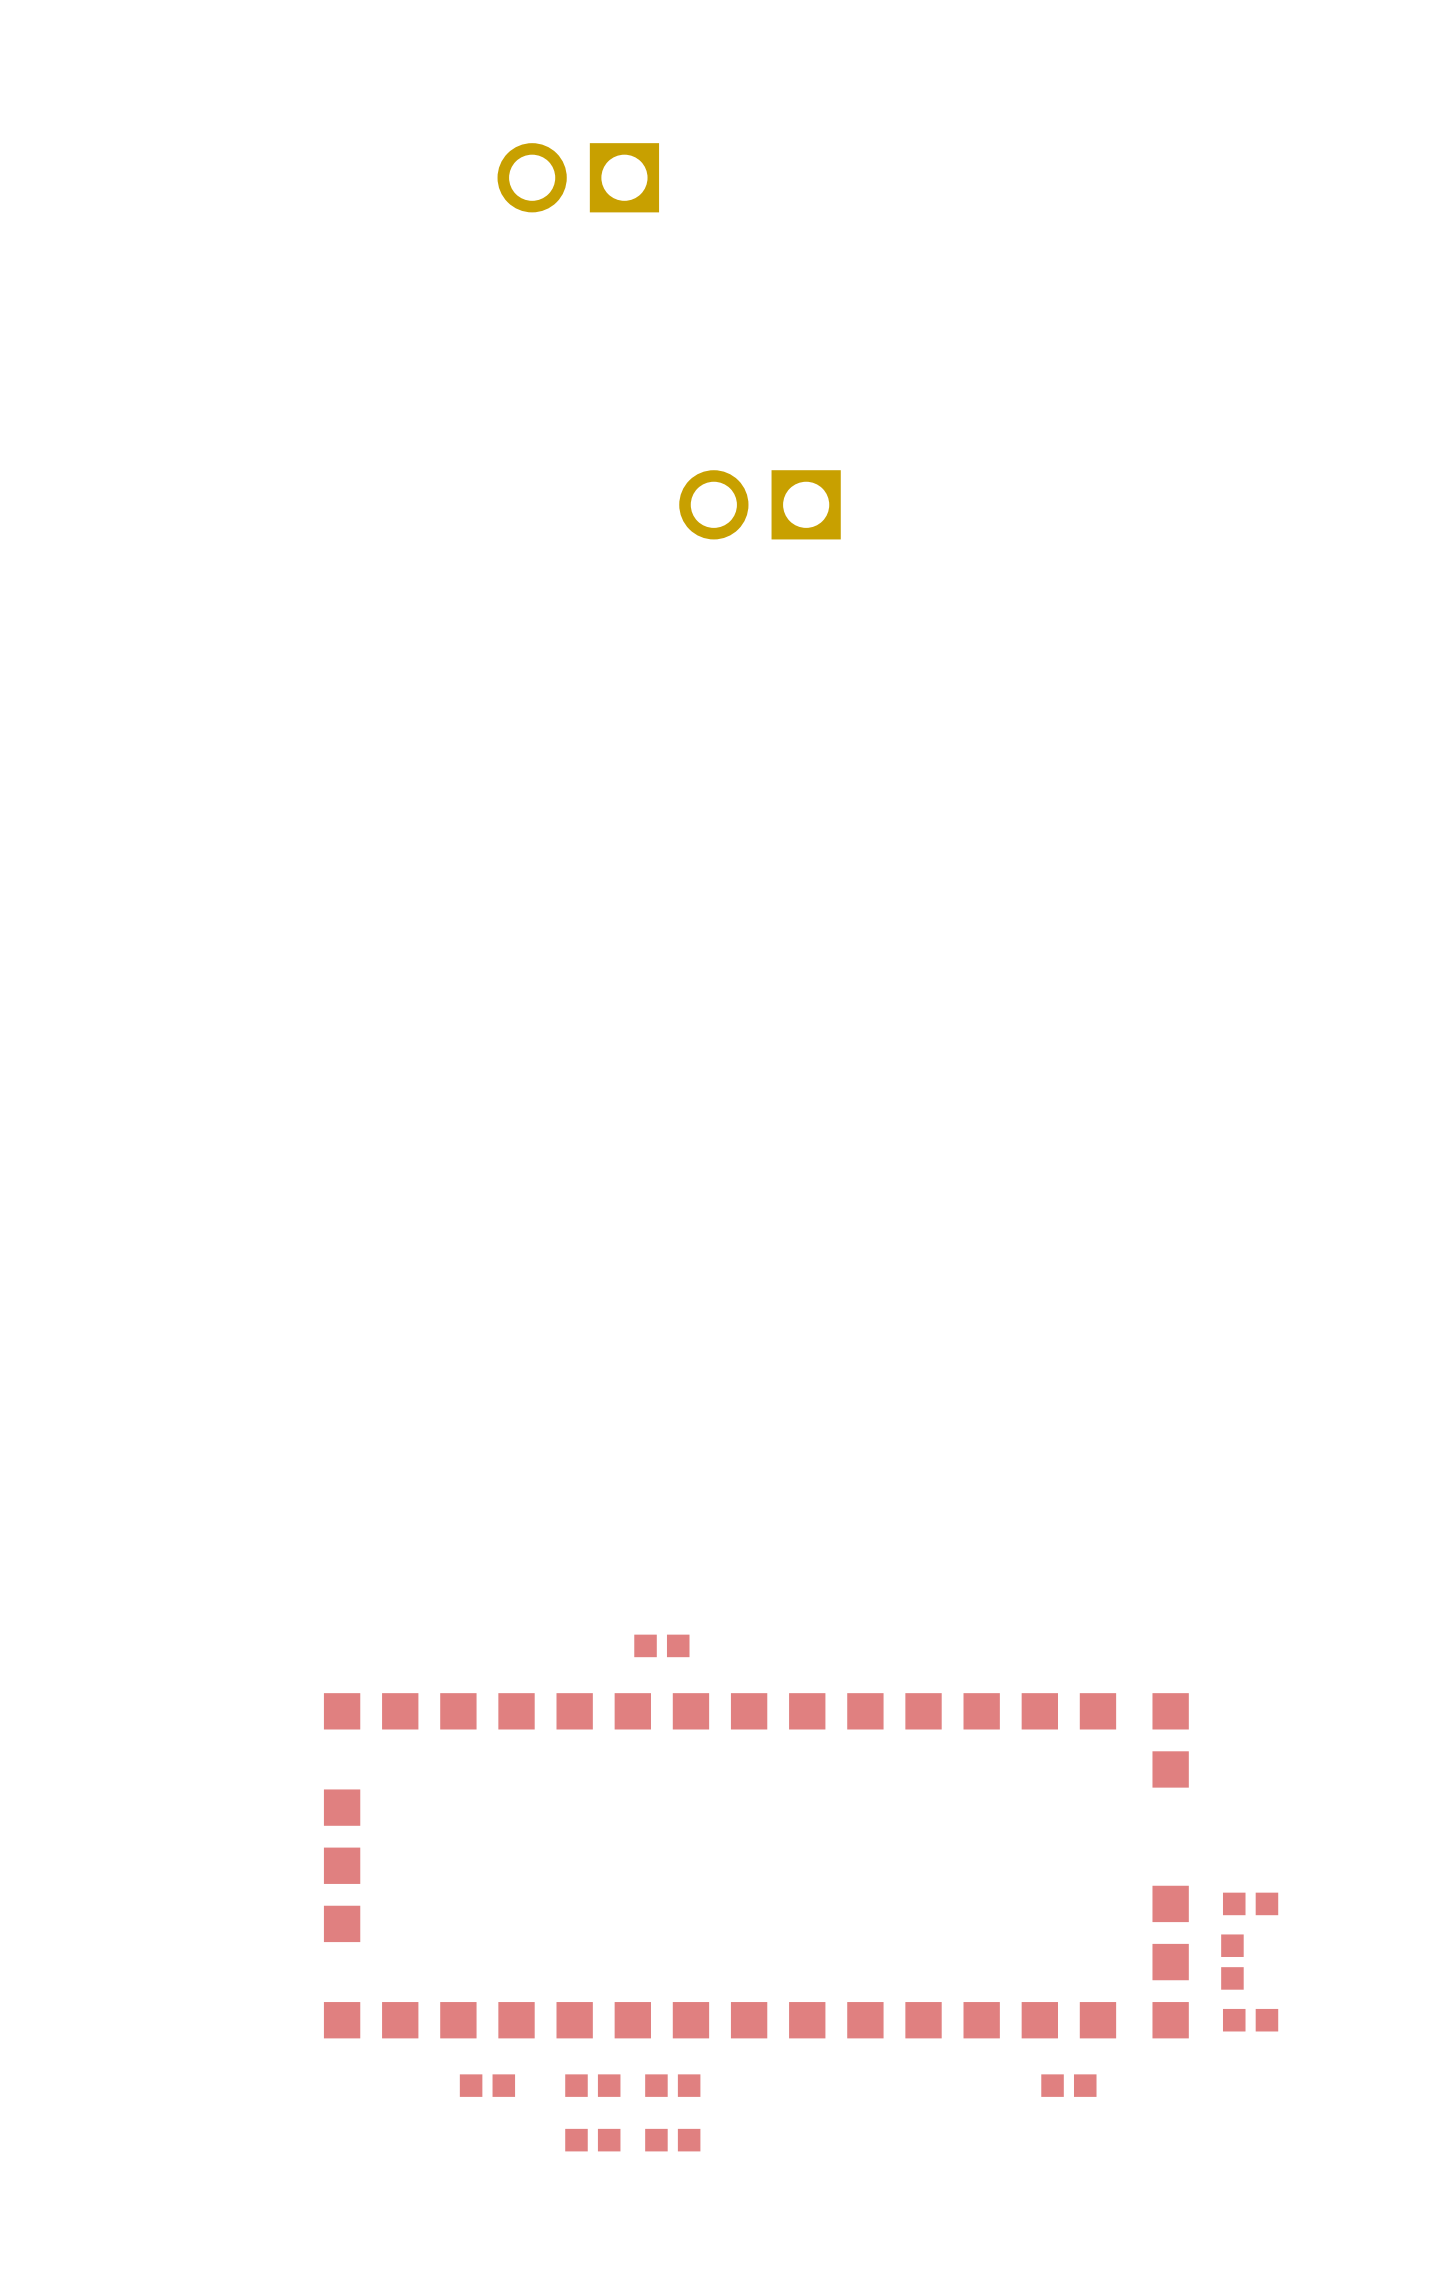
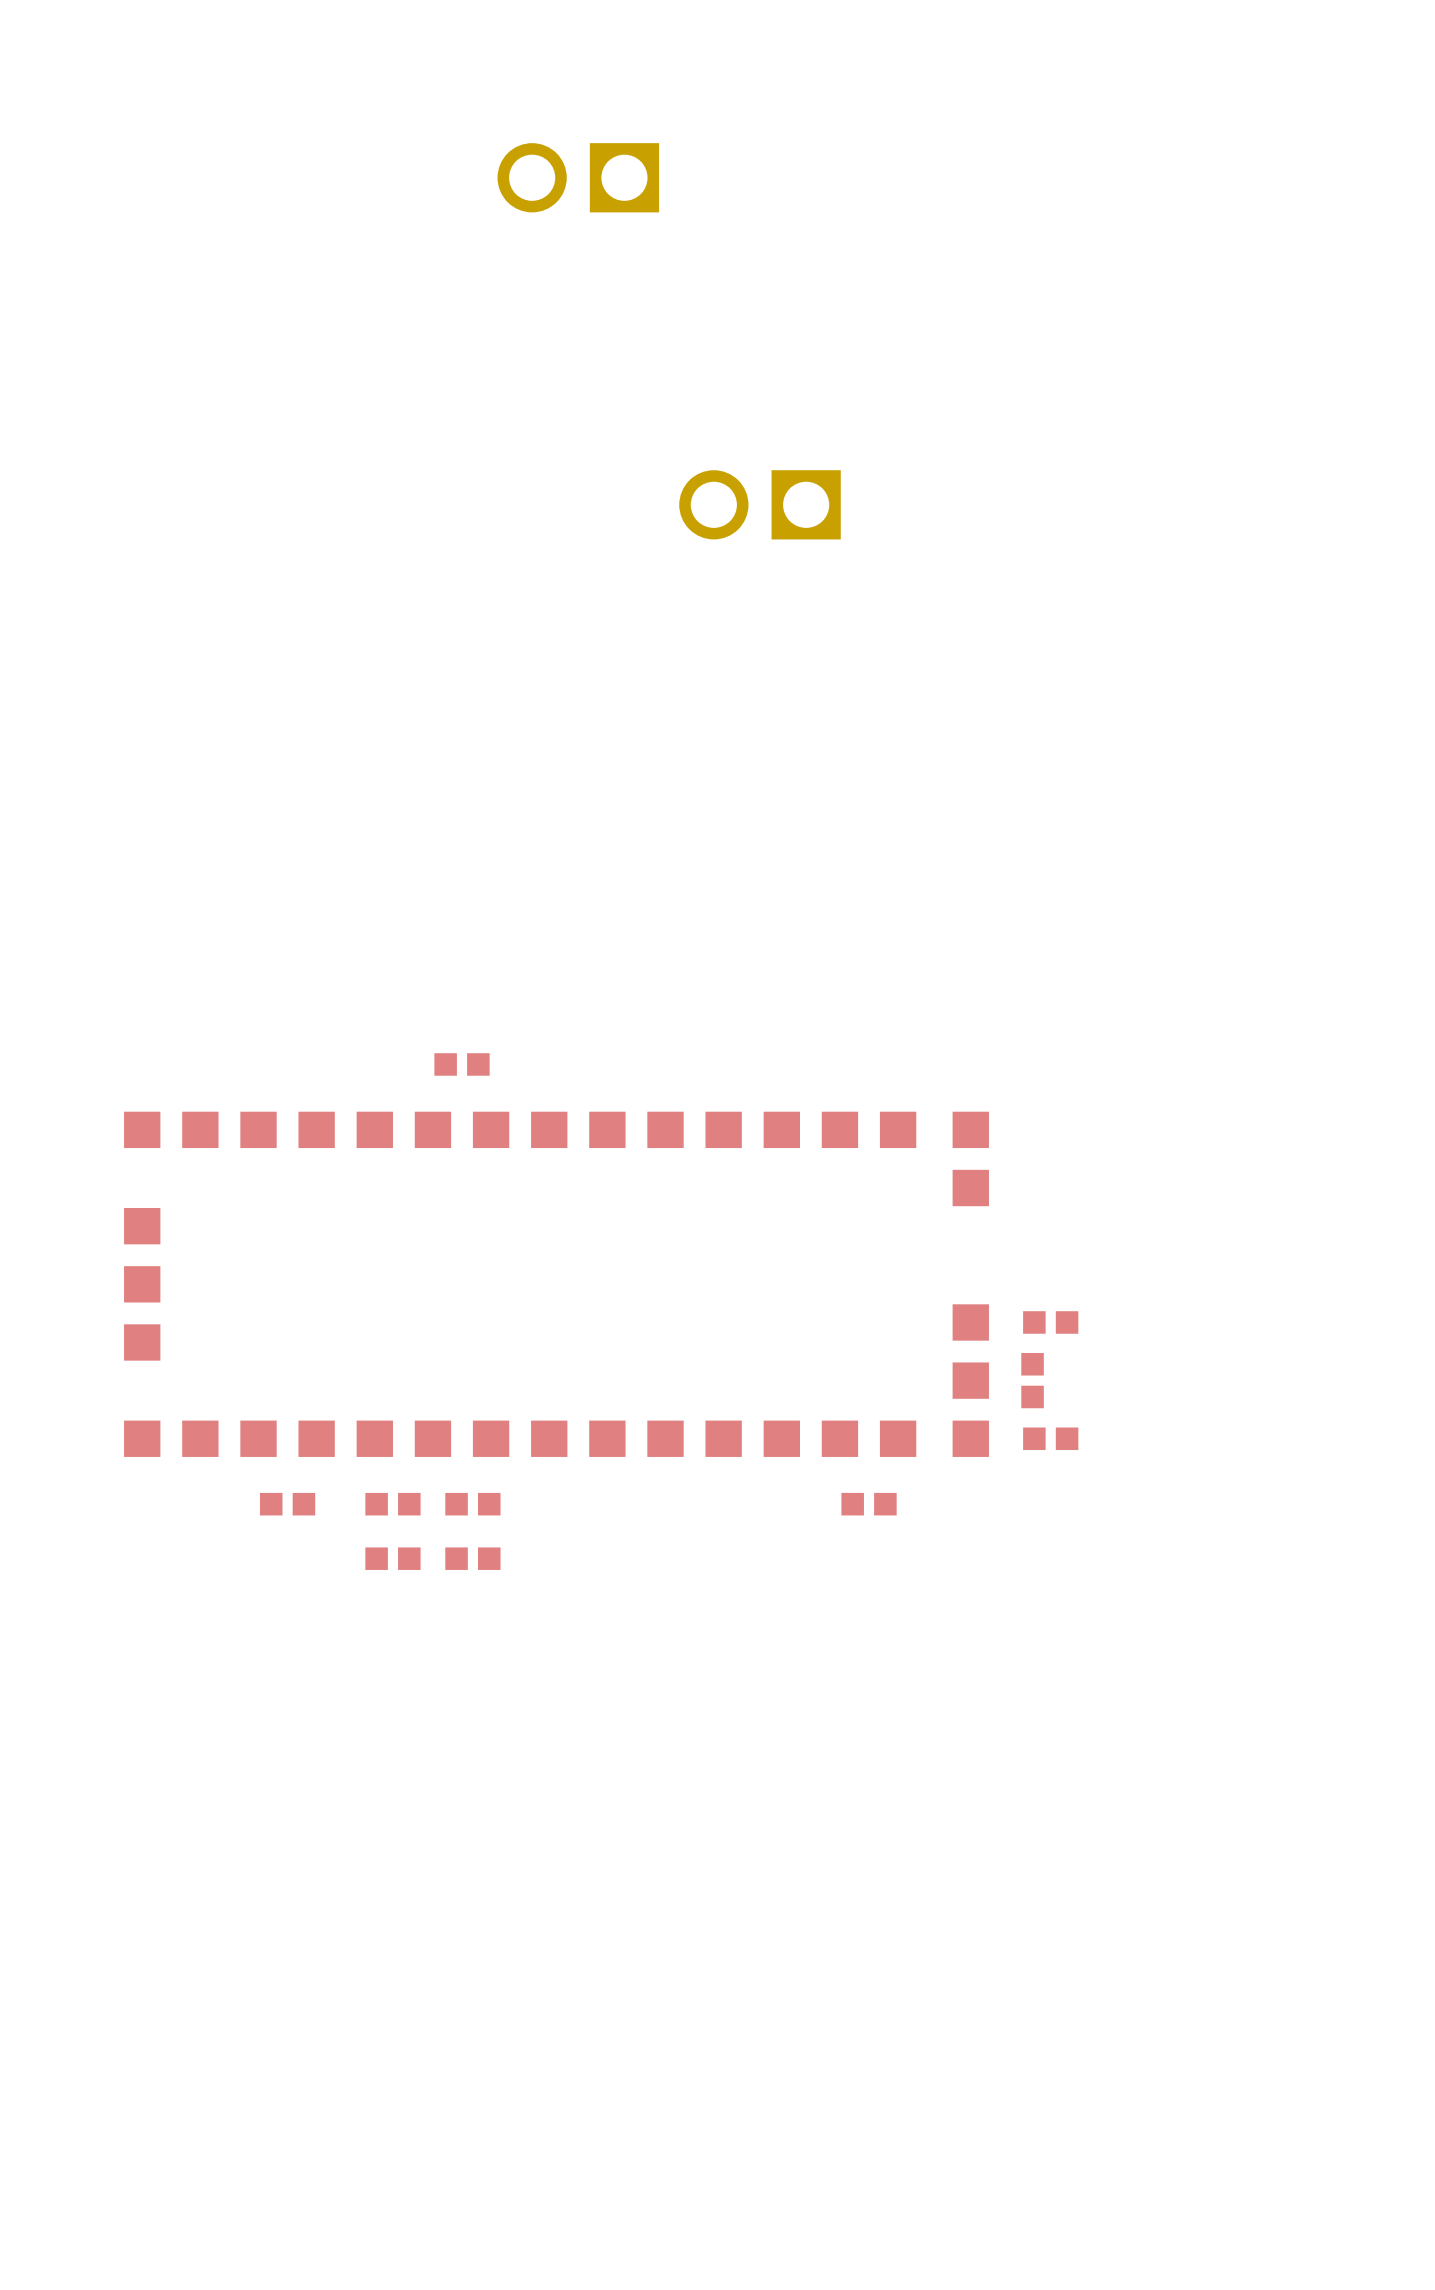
part: none -> (462, 1064)
part: none -> (1050, 1322)
part: none -> (1032, 1380)
part: none -> (1050, 1438)
part: none -> (287, 1504)
part: none -> (392, 1504)
part: none -> (472, 1504)
part: none -> (869, 1504)
part: none -> (392, 1558)
part: none -> (472, 1558)
part: (661, 1645) -> none
part position: (756, 1865) -> (556, 1284)
part: (1250, 1903) -> none
part: (1232, 1962) -> none
part: (1250, 2020) -> none
part: (487, 2085) -> none
part: (592, 2085) -> none
part: (672, 2085) -> none
part: (1068, 2085) -> none
part: (592, 2140) -> none
part: (672, 2140) -> none

